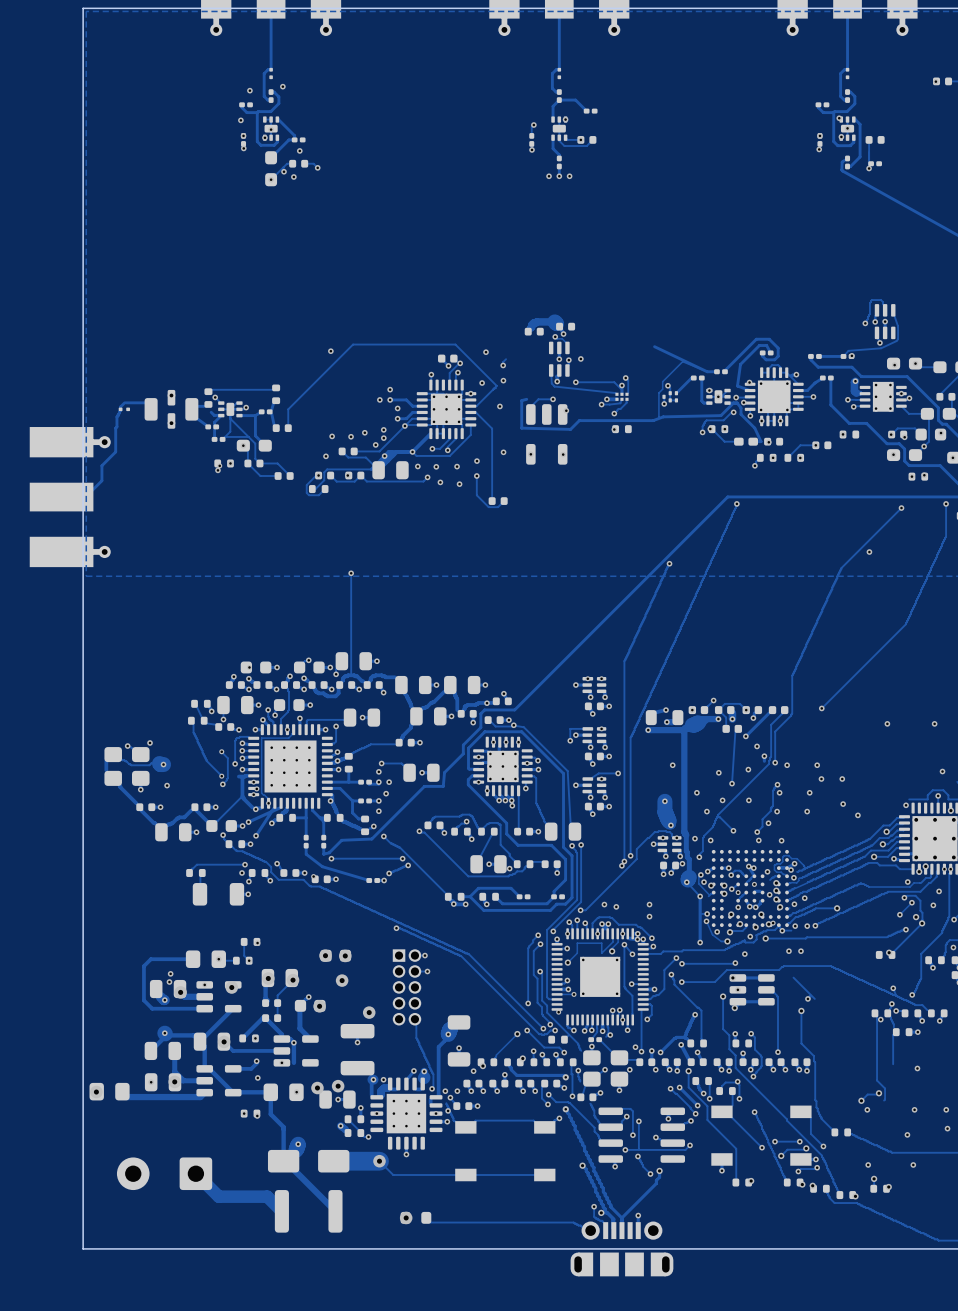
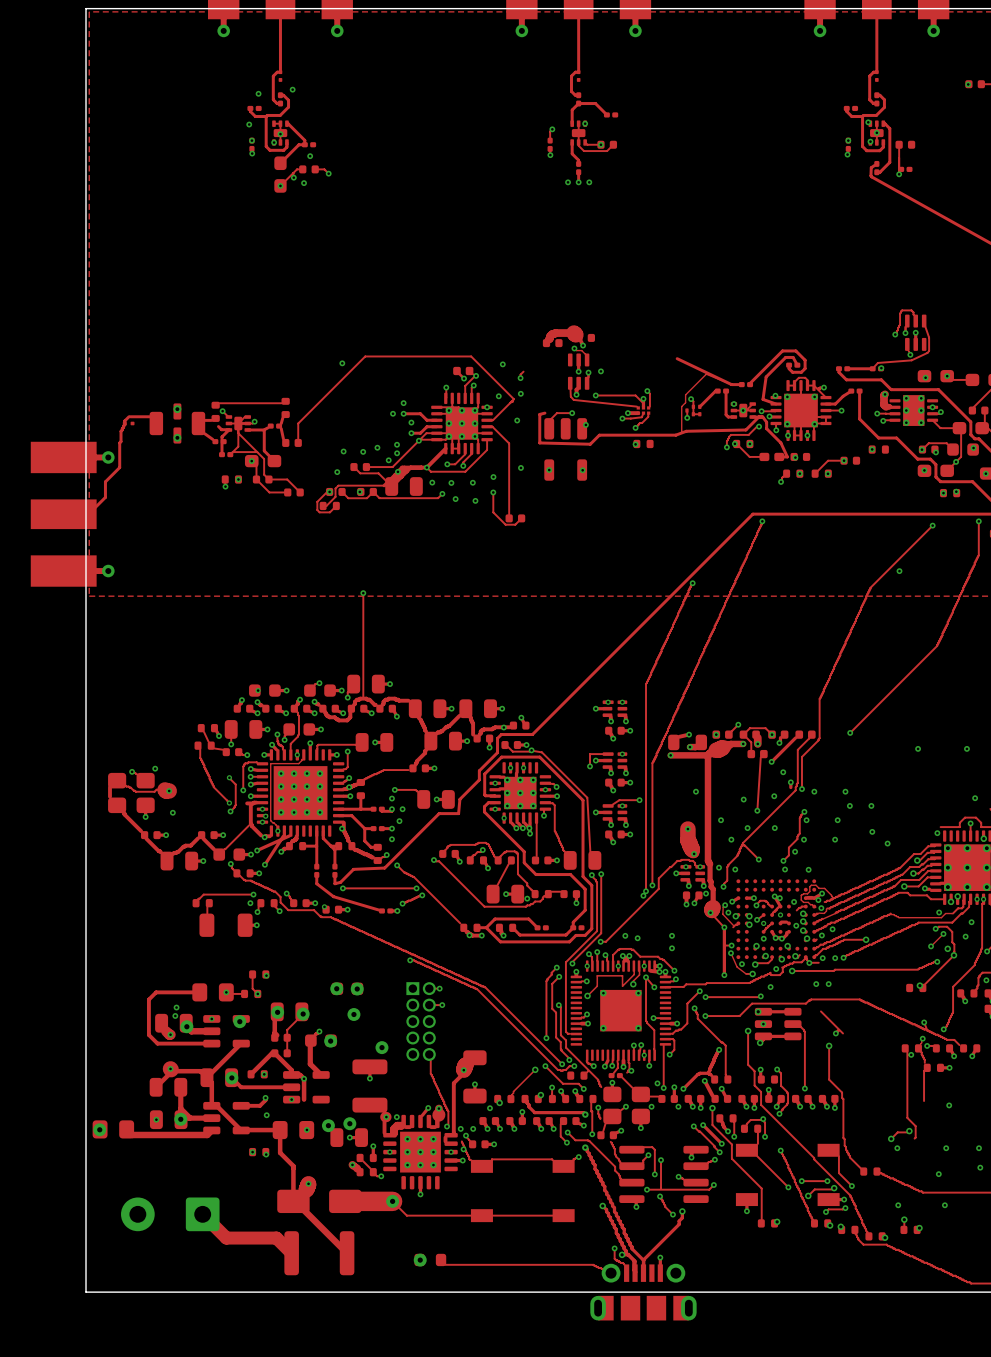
via: (219, 465) -> none
via: (518, 742) -> none
via: (773, 923) -> none
track: (557, 994) (574, 994) -> none
via: (574, 994) -> none
via: (558, 1012) -> none

